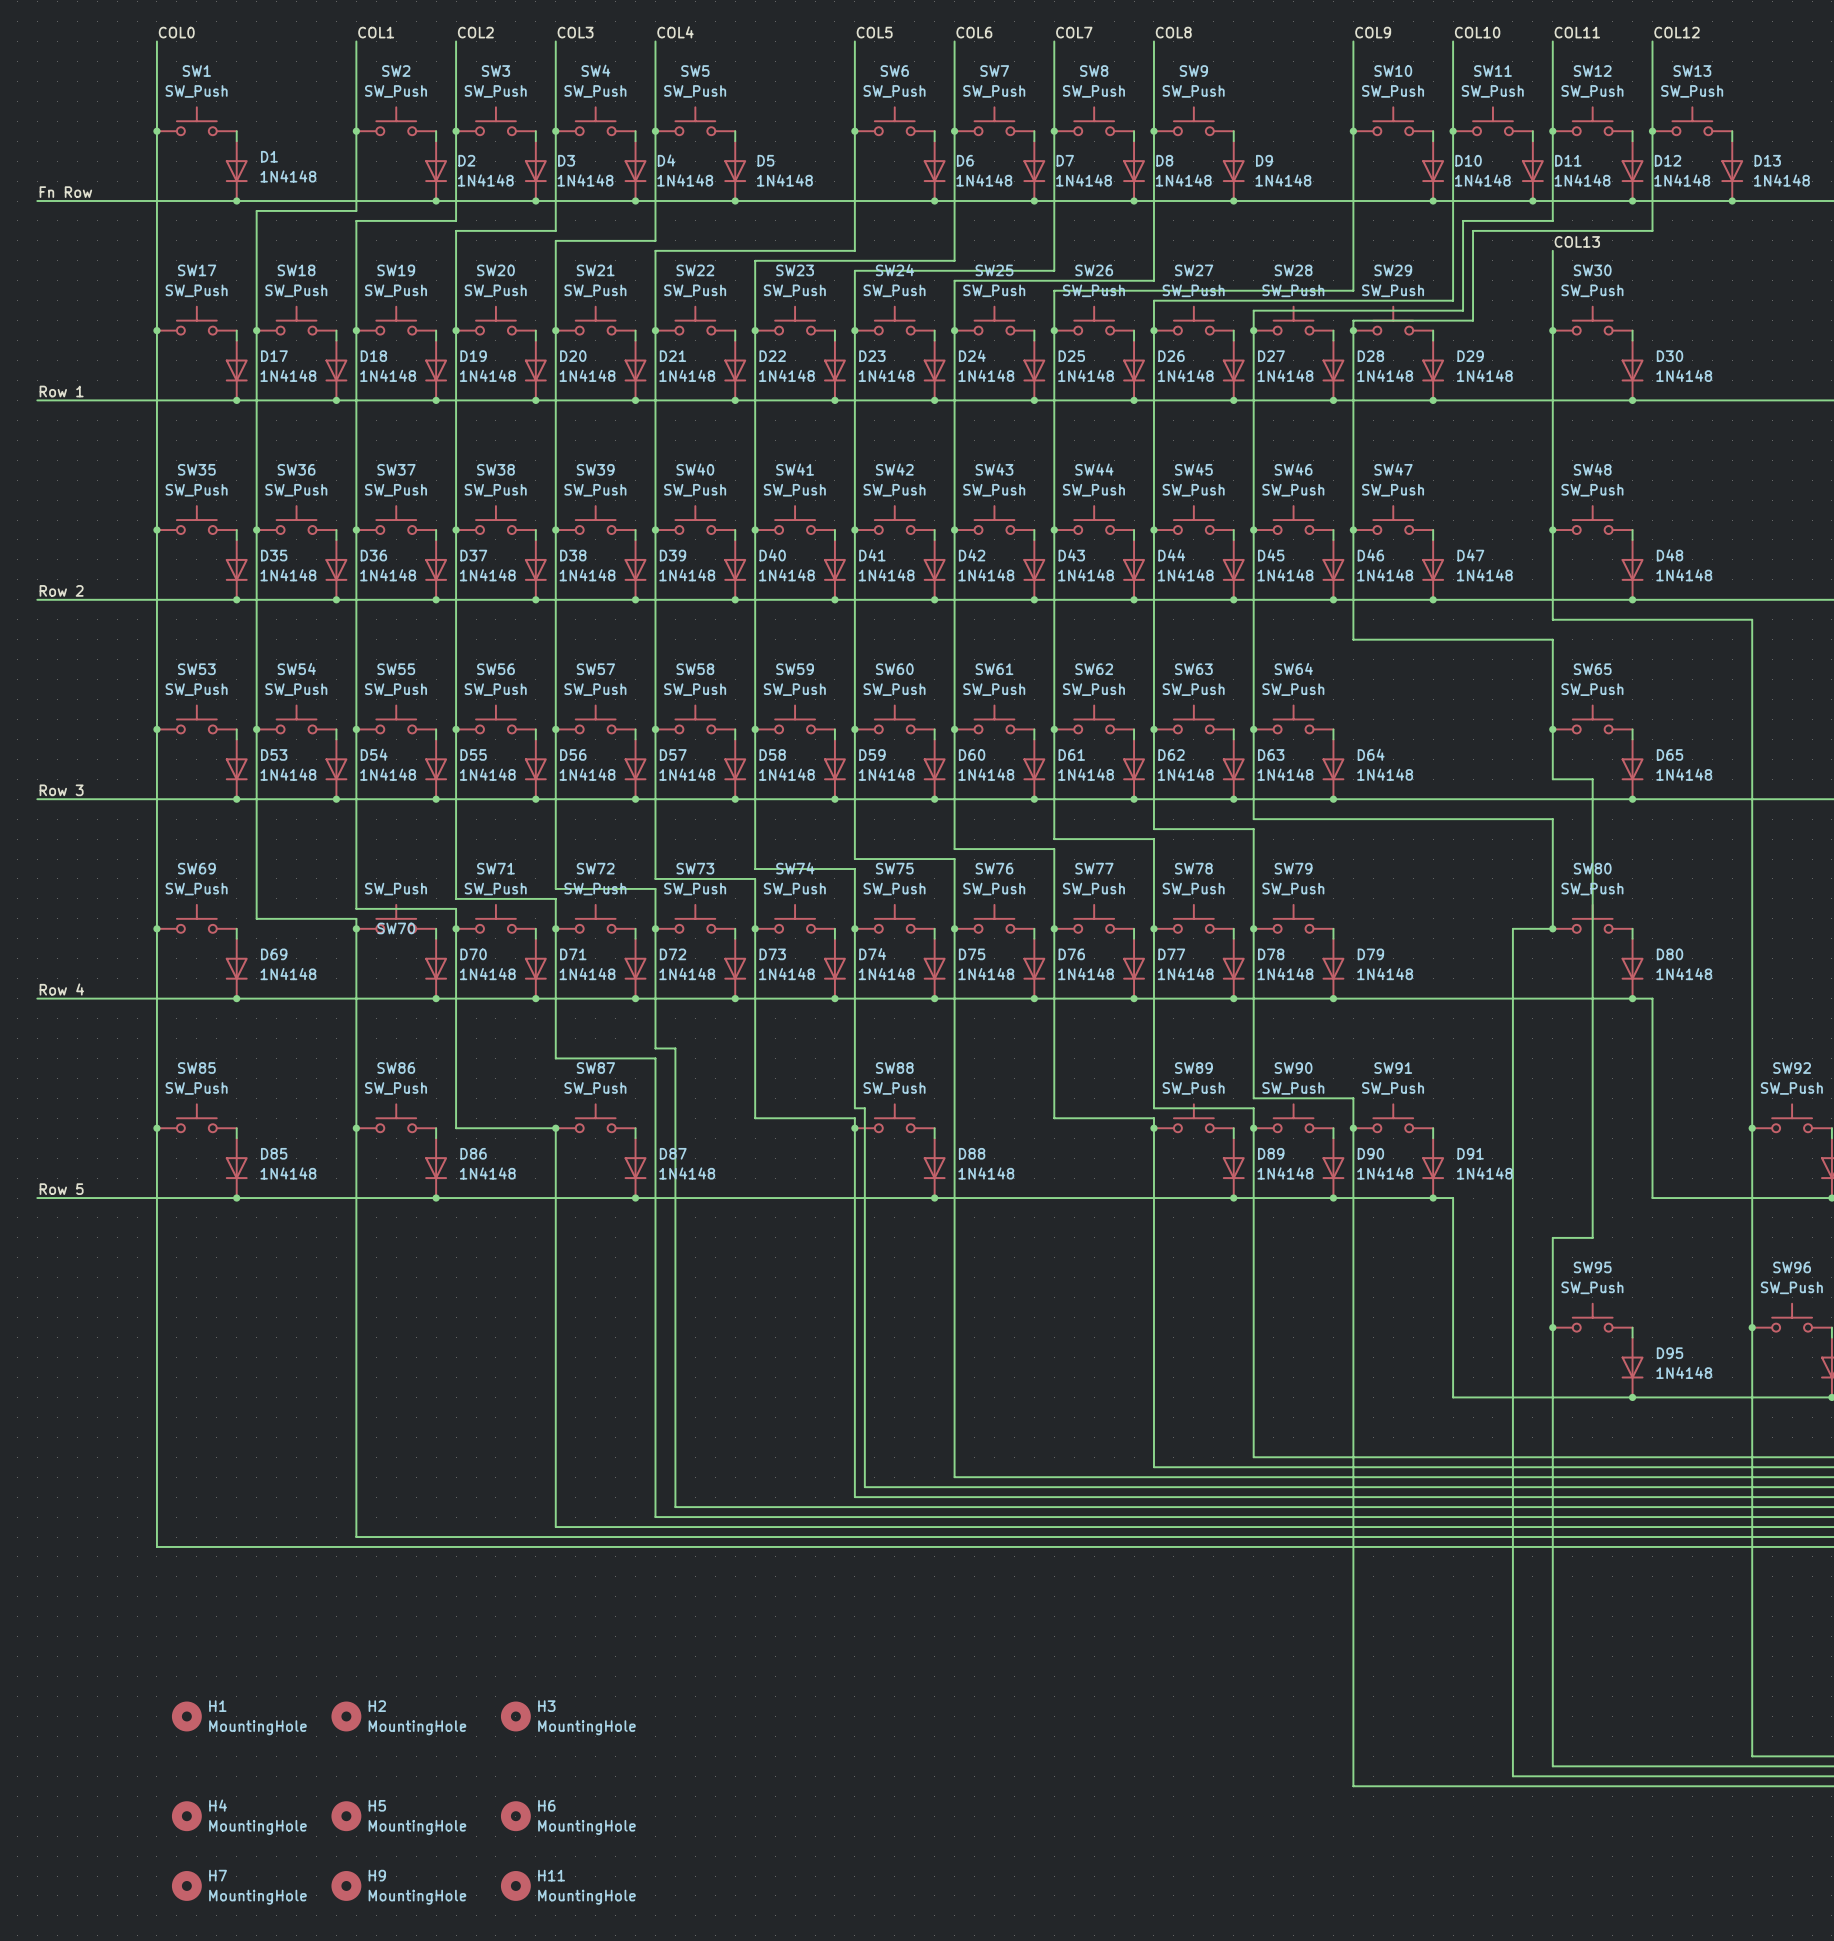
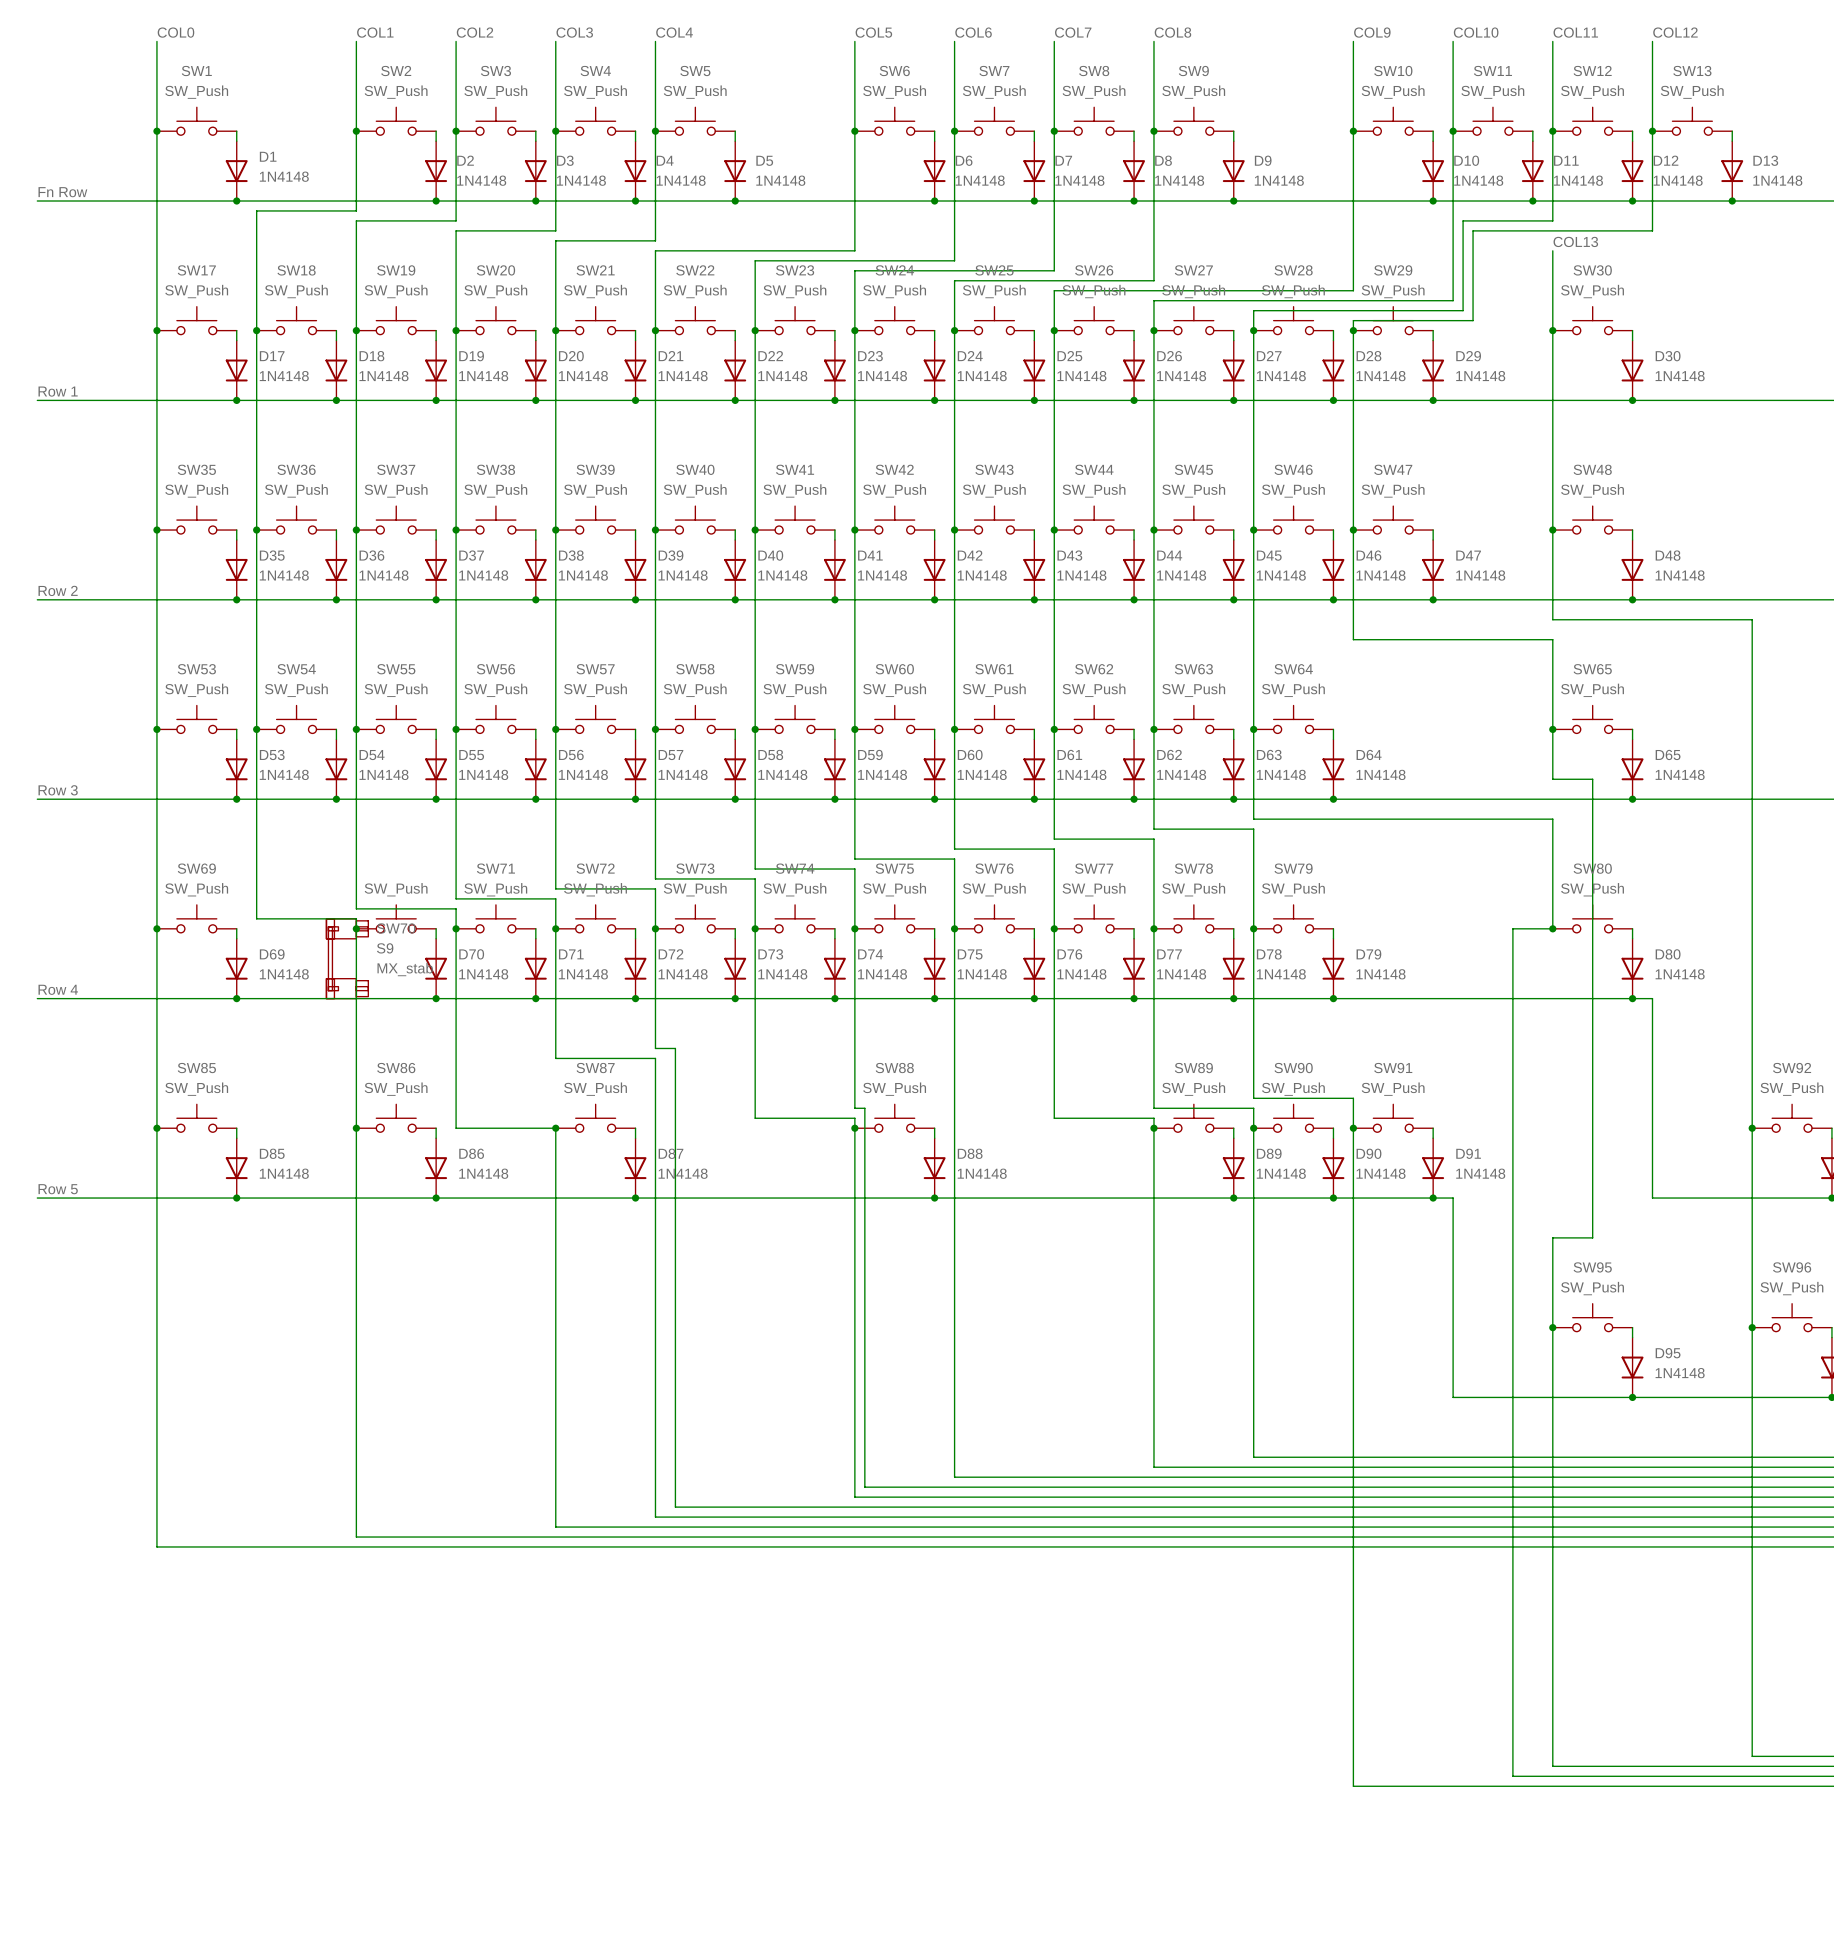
S9: none -> MX_stab (347, 958)
H1: MountingHole (186, 1716) -> none
H2: MountingHole (346, 1716) -> none
H3: MountingHole (515, 1716) -> none
H4: MountingHole (186, 1816) -> none
H5: MountingHole (346, 1816) -> none
H6: MountingHole (515, 1816) -> none
H7: MountingHole (186, 1885) -> none
H9: MountingHole (346, 1885) -> none
H11: MountingHole (515, 1885) -> none

